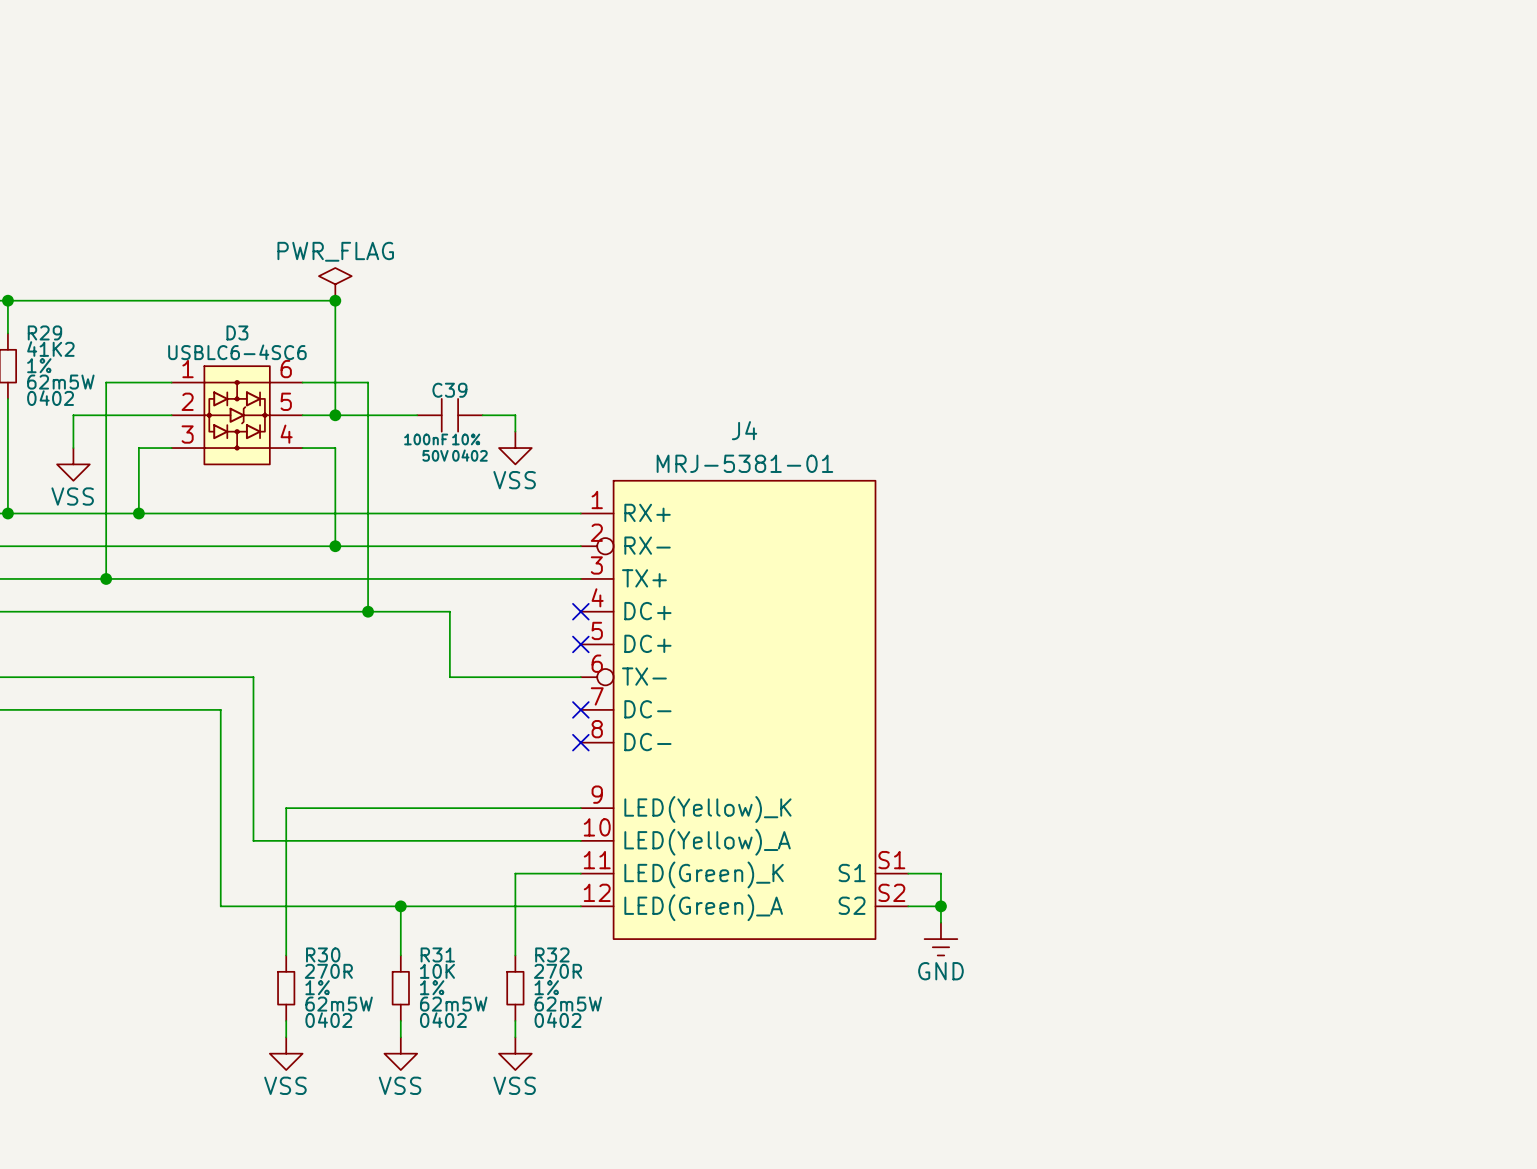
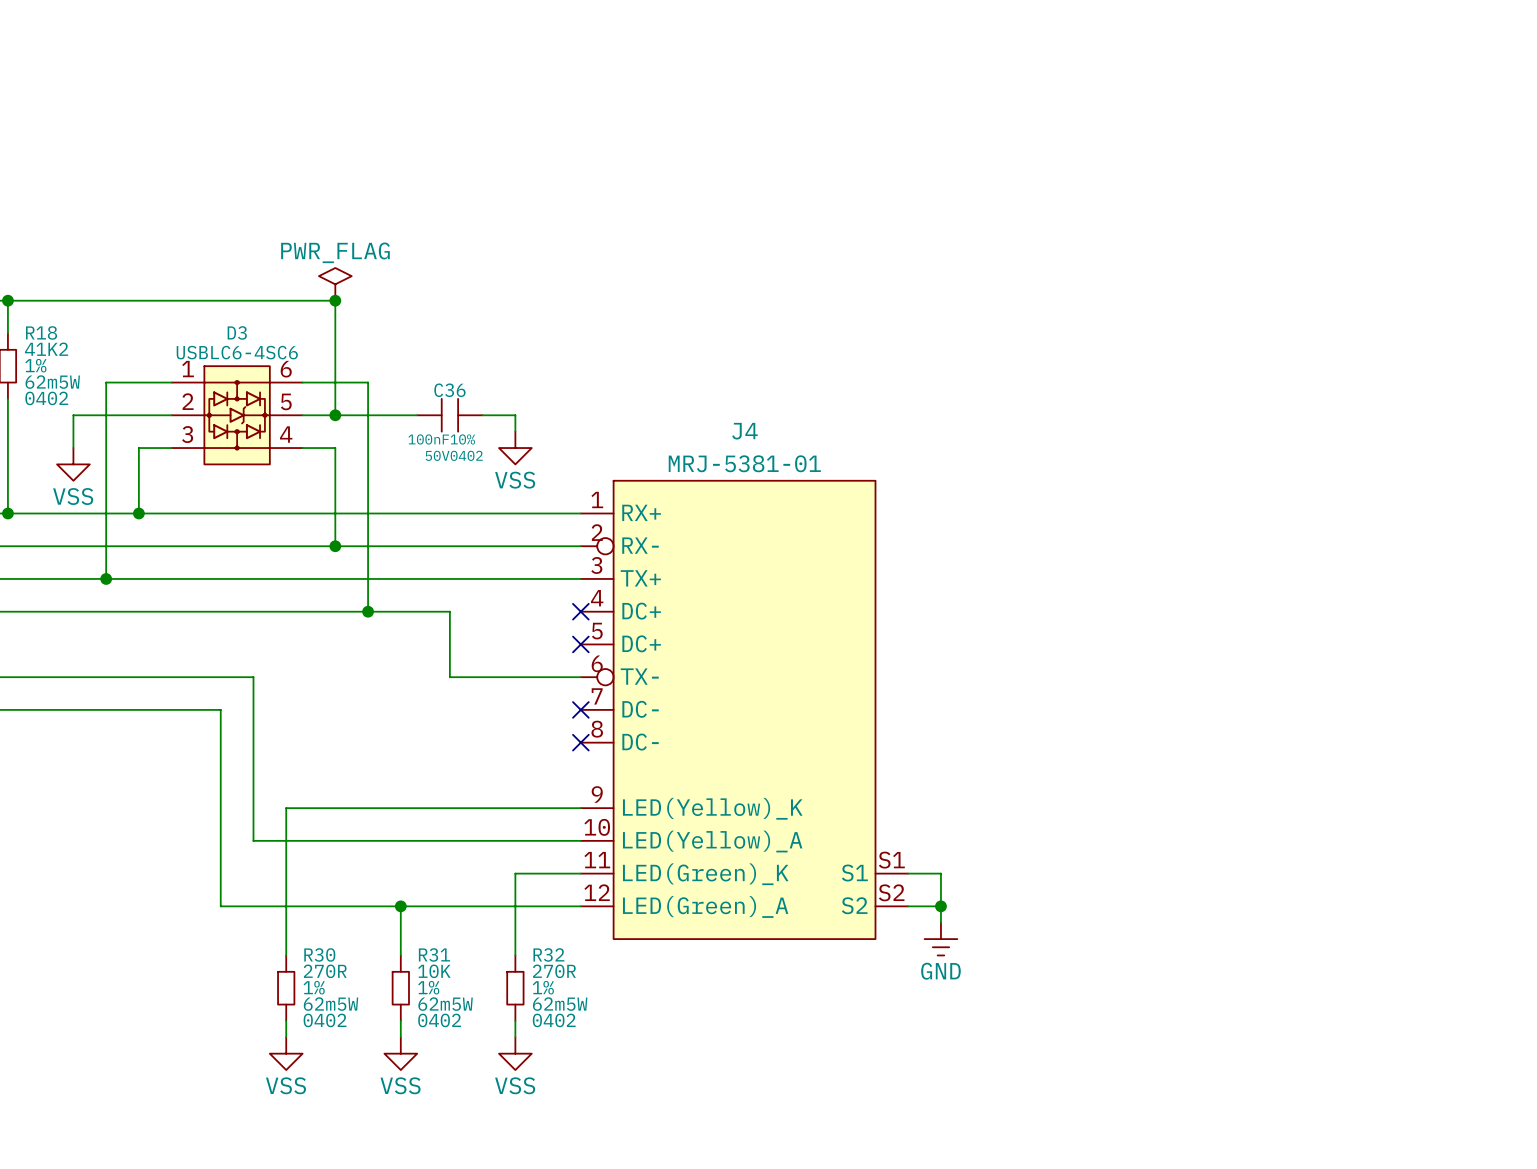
R29 name: R29 (44, 332) -> R18 (41, 332)
C39 name: C39 (449, 390) -> C36 (449, 390)

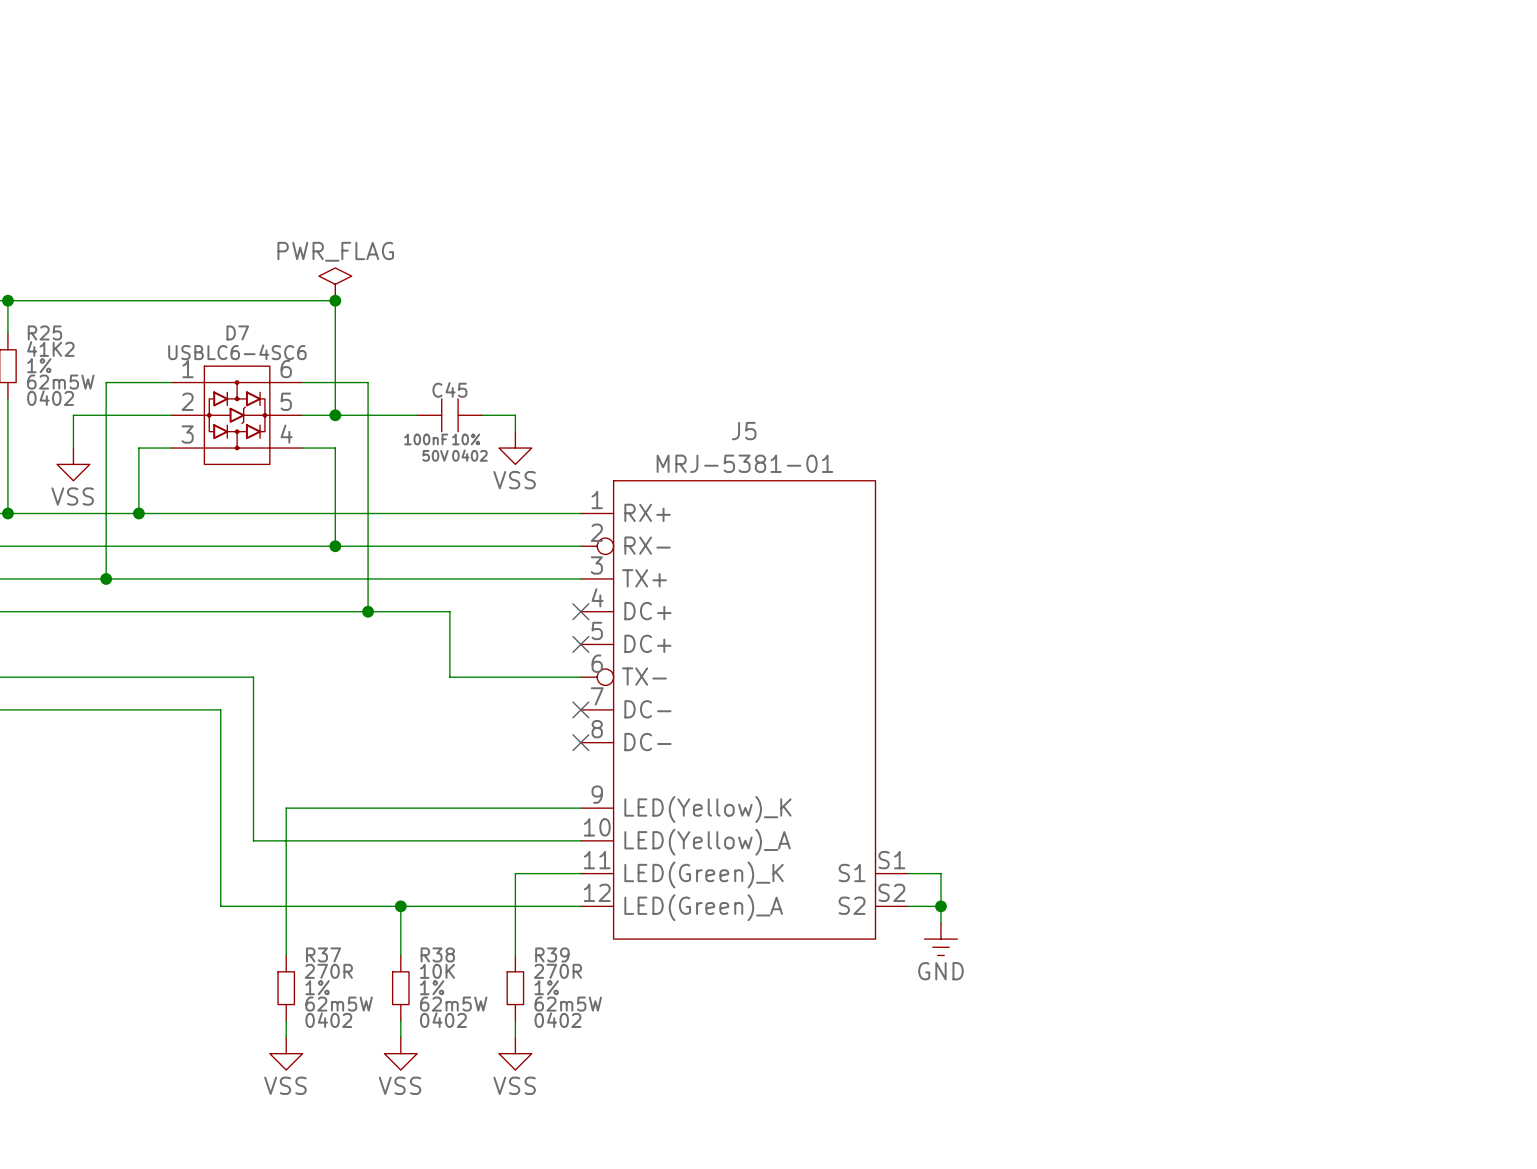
R18 name: R18 (41, 332) -> R25 (44, 332)
D3 name: D3 (237, 332) -> D7 (237, 332)
C36 name: C36 (449, 390) -> C45 (449, 389)
J4 name: J4 (744, 431) -> J5 (744, 431)
R30 name: R30 (319, 954) -> R37 (323, 954)
R31 name: R31 (434, 954) -> R38 (437, 954)
R32 name: R32 (548, 954) -> R39 (552, 954)

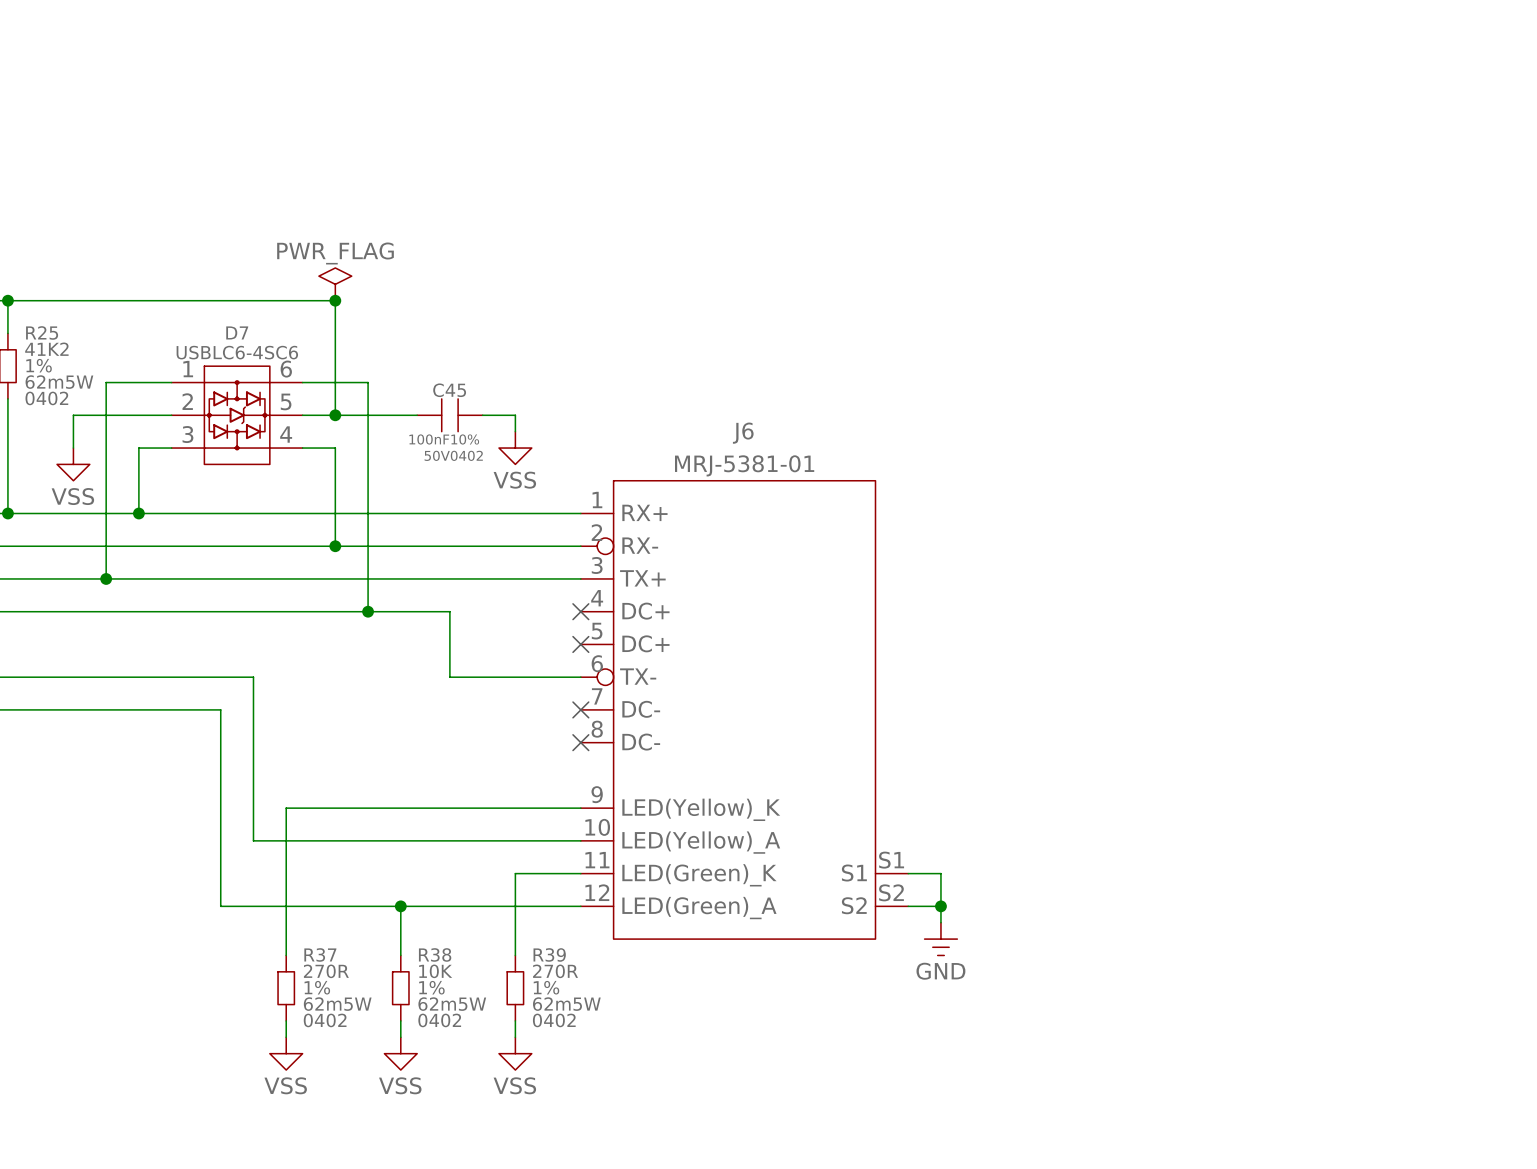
J5 name: J5 (744, 431) -> J6 (743, 433)

